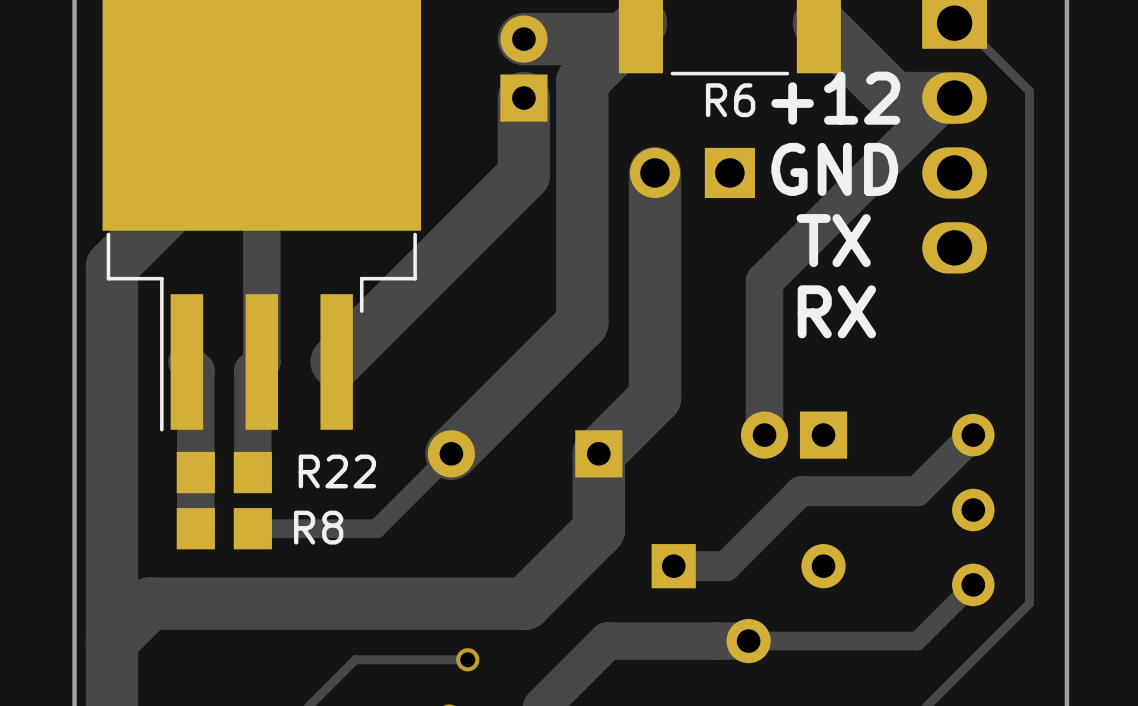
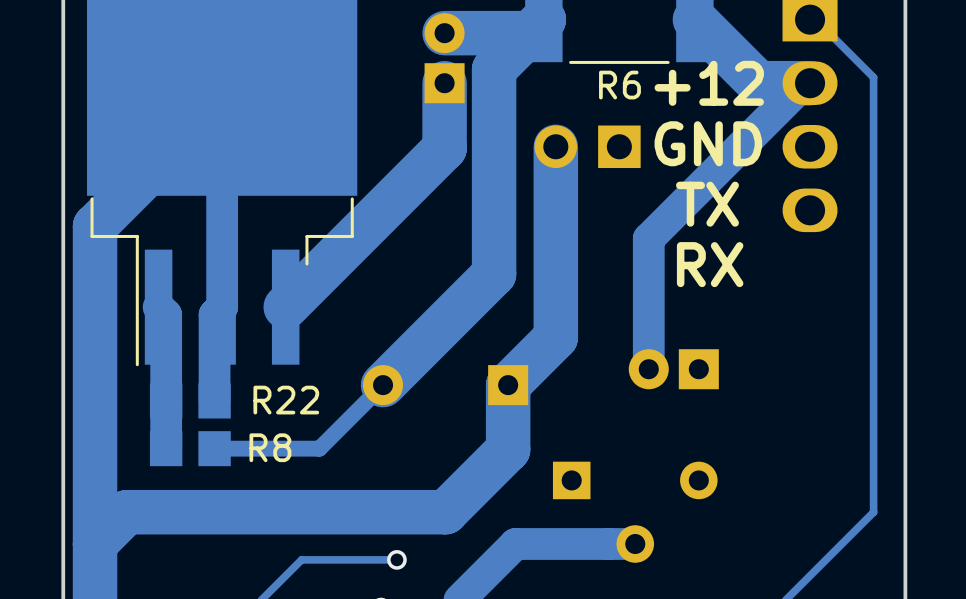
track: (973, 435) (917, 491) (800, 491) (725, 566) (673, 566) -> none
part: (973, 509) -> none
track: (973, 584) (917, 641) (748, 641) -> none

